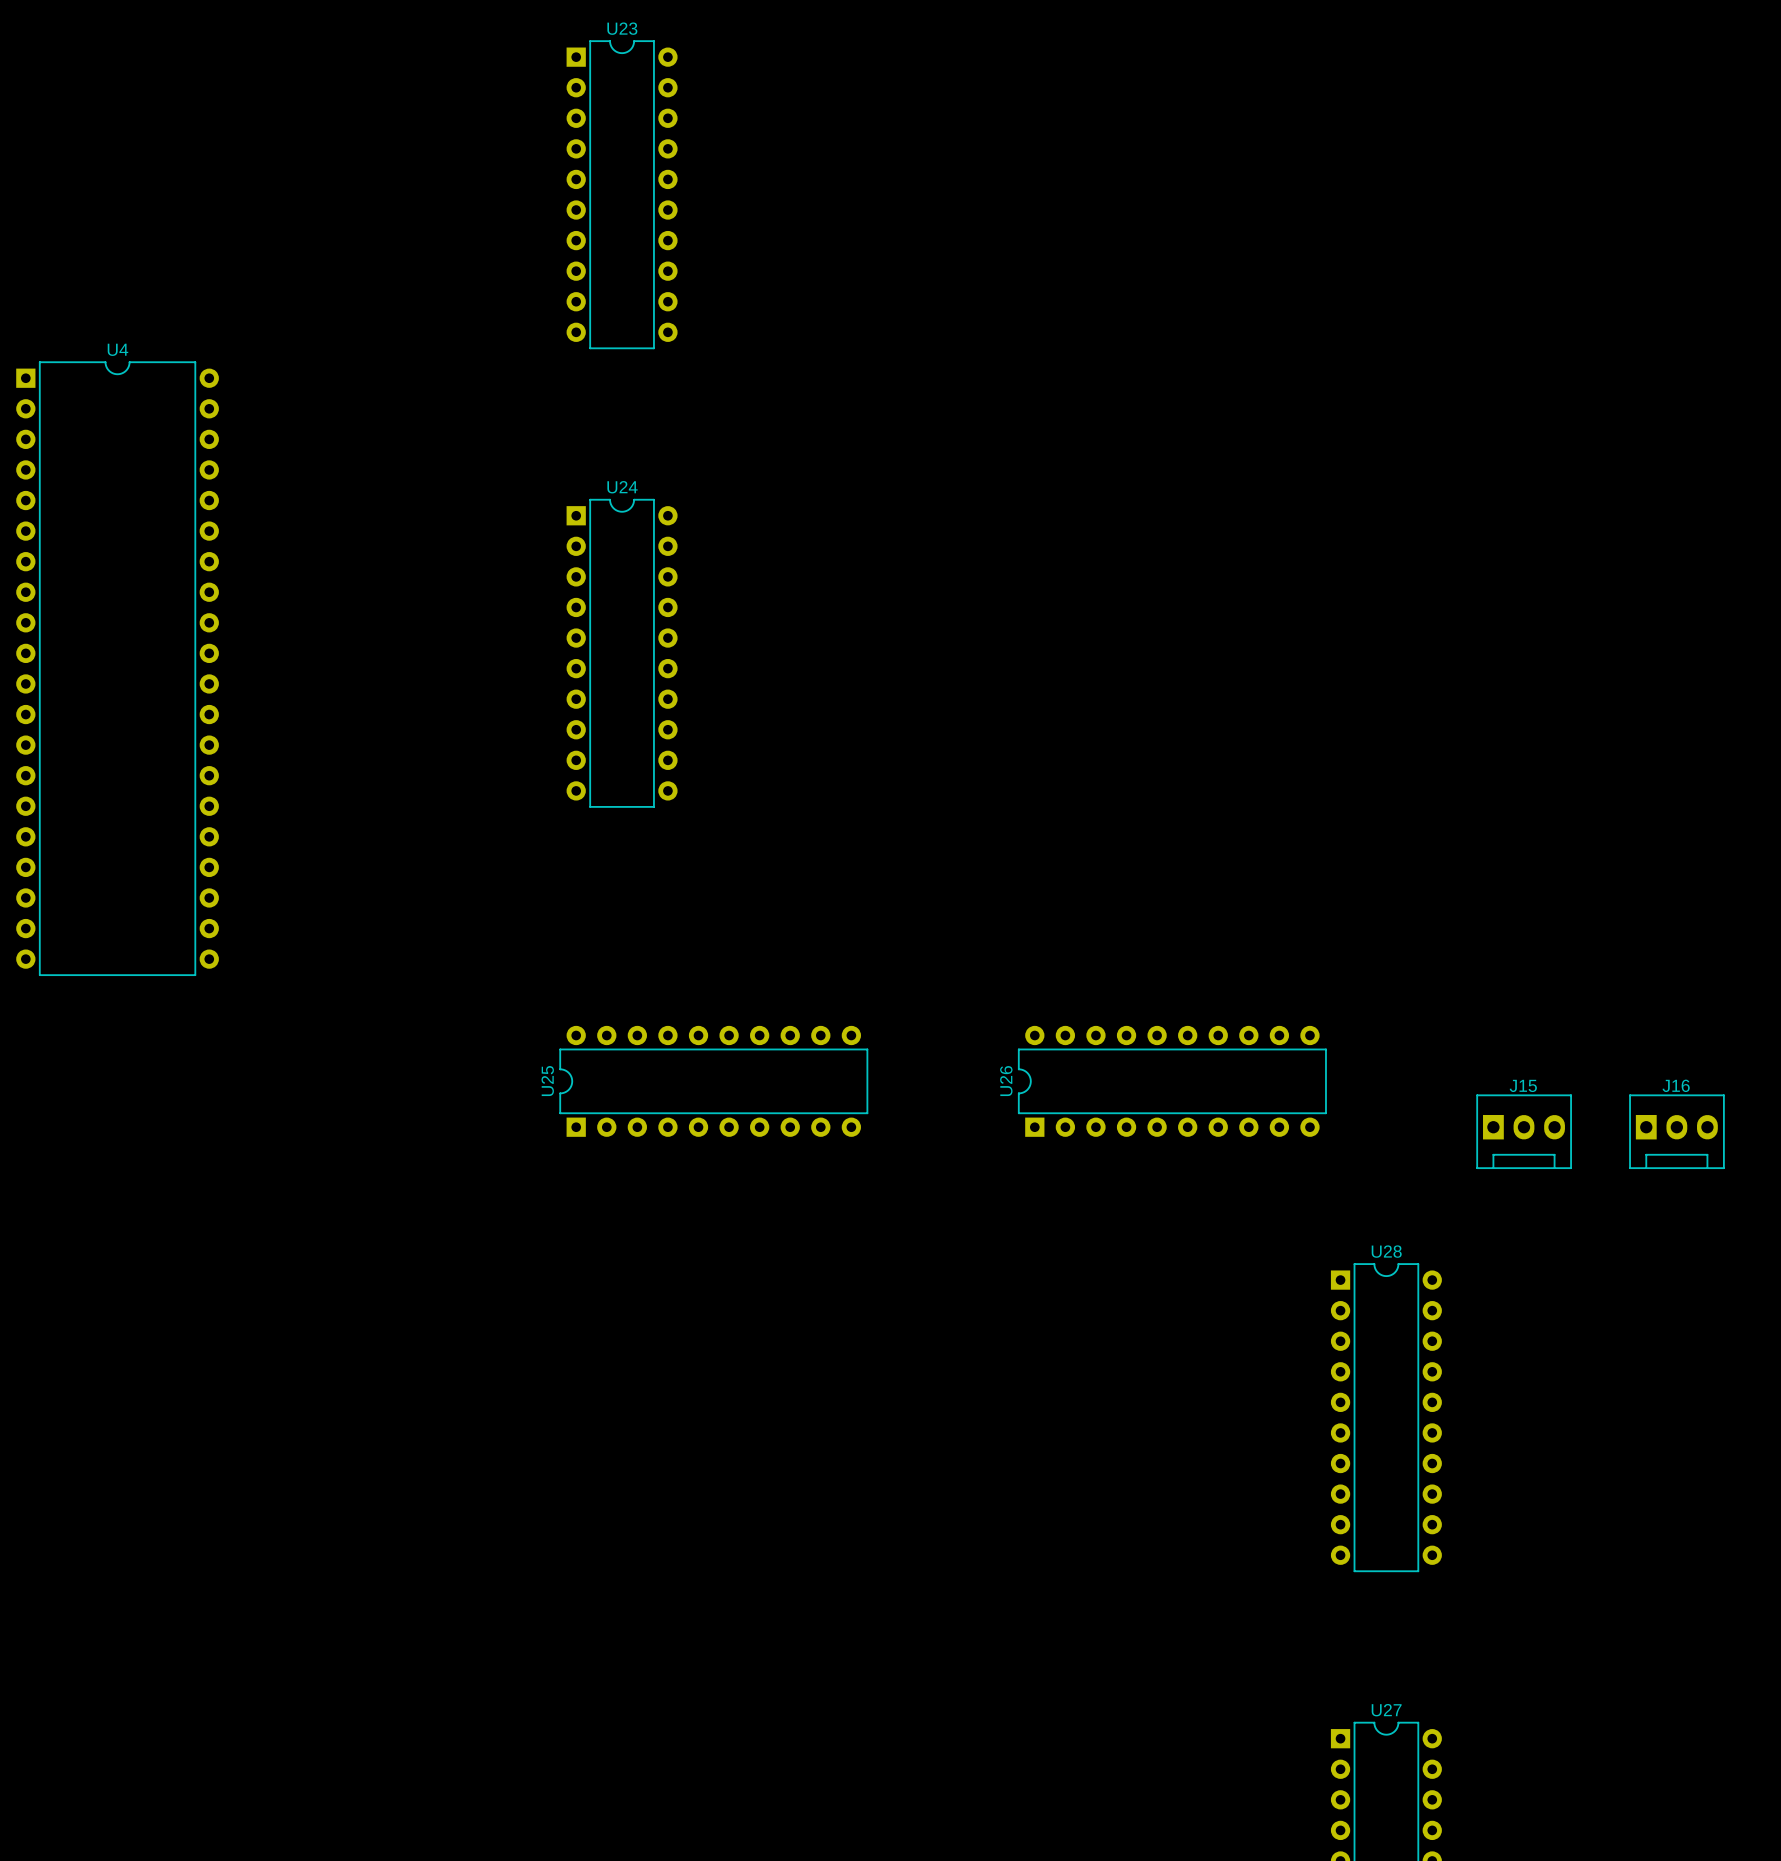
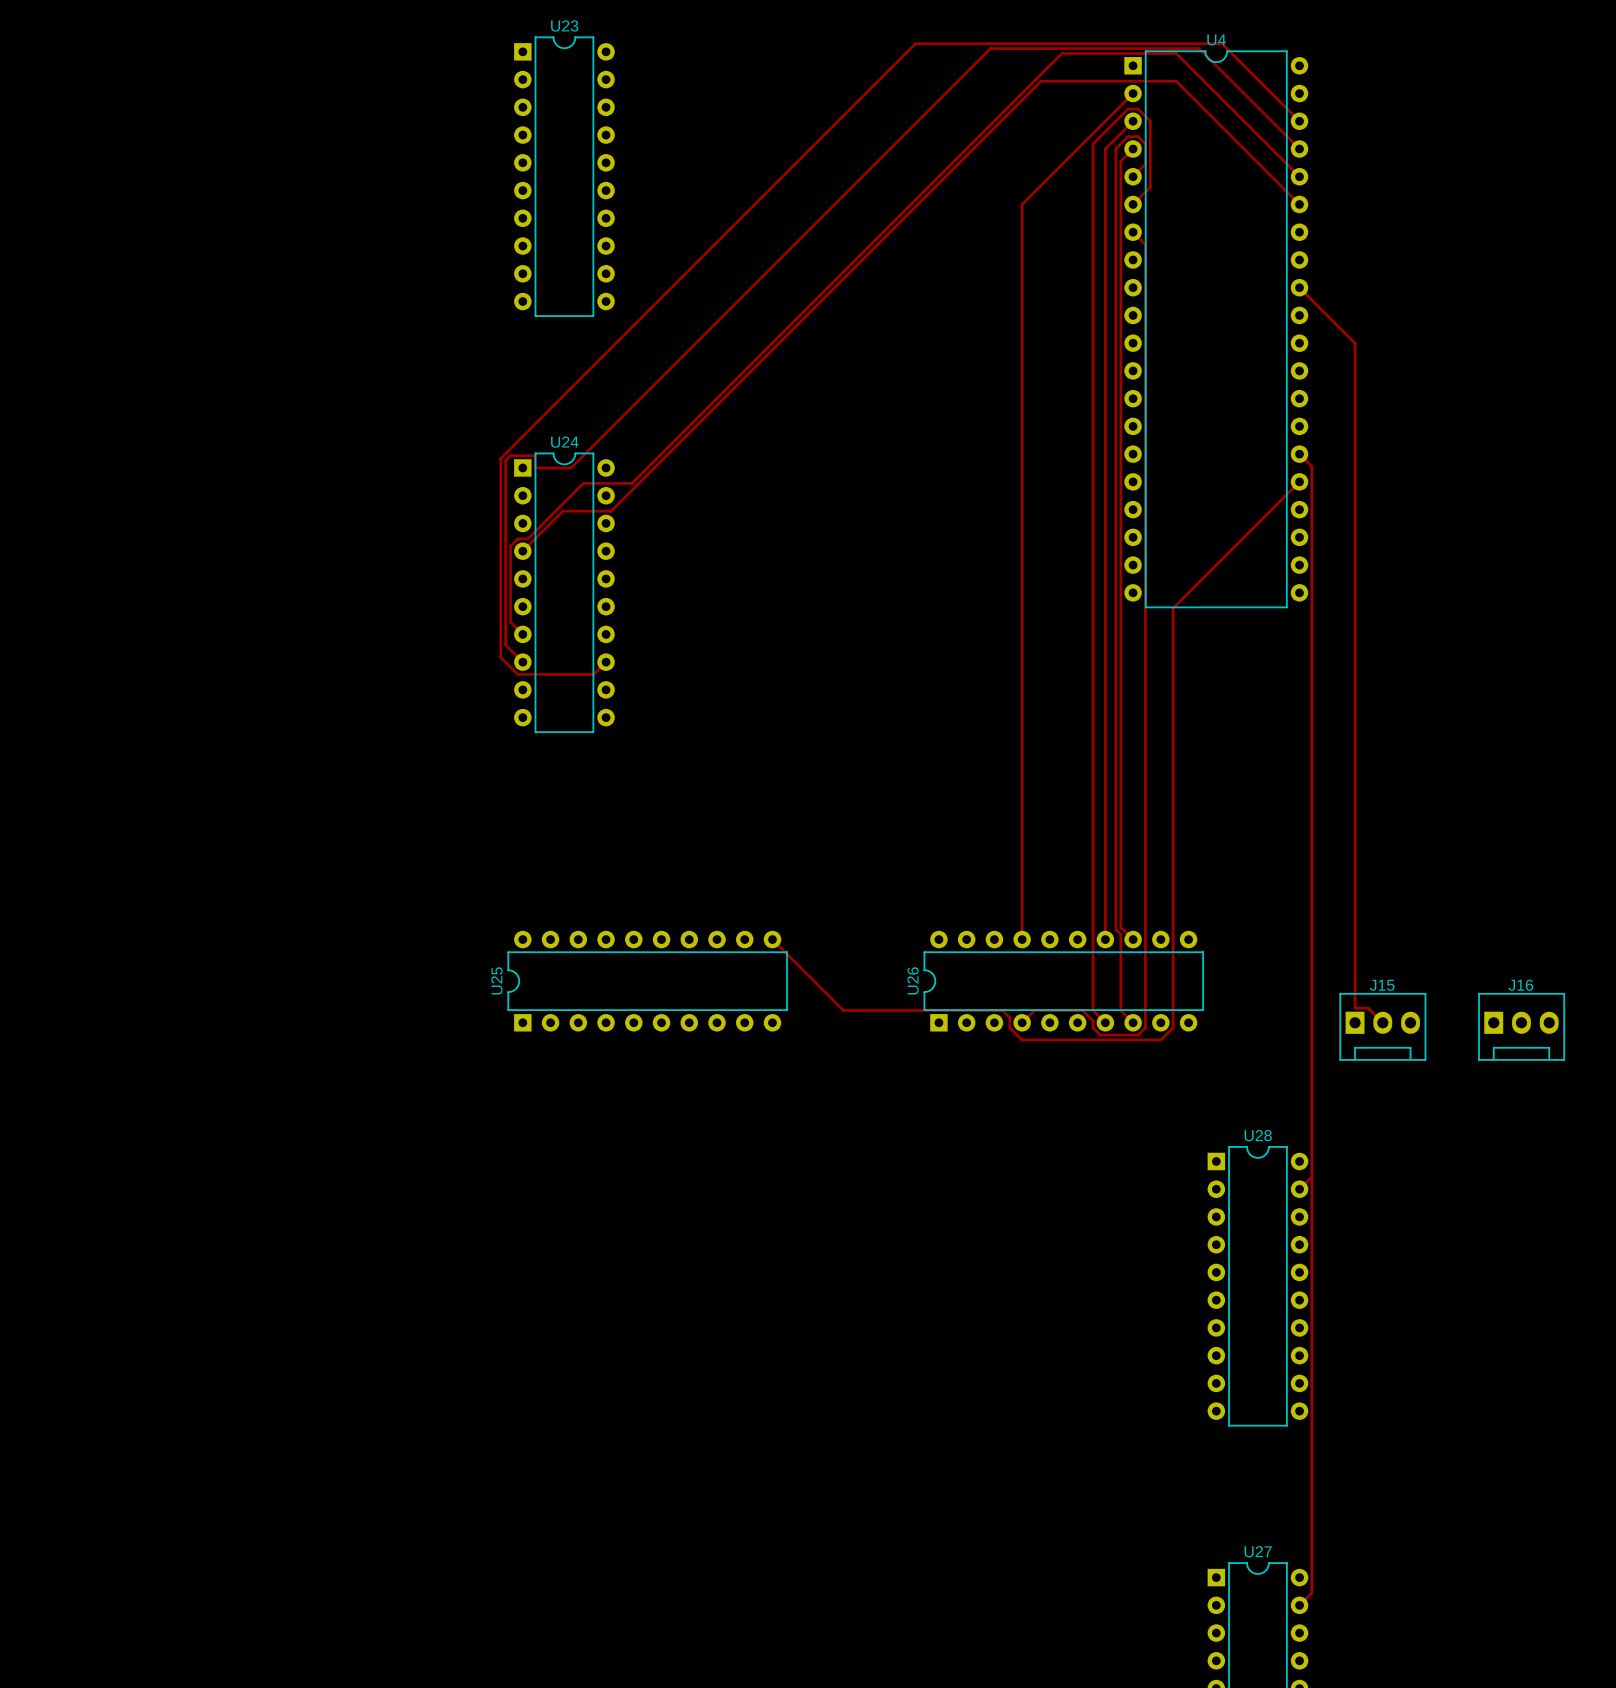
track: none -> (1133, 93) (1022, 204) (1022, 939)
track: none -> (1133, 121) (1105, 148) (1105, 939)
track: none -> (1299, 121) (1221, 43) (915, 43) (500, 458) (500, 657) (517, 674) (593, 674) (606, 662)
track: none -> (1133, 149) (1120, 161) (1120, 927) (1133, 939)
track: none -> (1299, 149) (1199, 48) (990, 48) (571, 467) (535, 467) (535, 455) (510, 455) (505, 460) (505, 644) (522, 662)
track: none -> (1133, 176) (1145, 164) (1145, 143) (1138, 136) (1127, 136) (1115, 148) (1115, 929) (1120, 934) (1120, 1010) (1133, 1022)
track: none -> (1299, 176) (1176, 53) (1061, 53) (631, 483) (583, 483) (527, 538) (517, 538) (510, 546) (510, 622) (522, 634)
track: none -> (1133, 204) (1150, 187) (1150, 121) (1138, 108) (1127, 108) (1093, 143) (1093, 1010) (1105, 1022)
track: none -> (1299, 204) (1176, 81) (1041, 81) (611, 511) (562, 511) (522, 551)
track: none -> (1133, 232) (1145, 244) (1145, 1027) (1138, 1035) (1100, 1035) (1093, 1027) (1093, 1020) (1082, 1010) (1034, 1010) (1022, 1022)
track: none -> (1299, 287) (1355, 343) (1355, 1008) (1368, 1008) (1382, 1022)
track: none -> (1299, 454) (1311, 466) (1311, 1593) (1299, 1605)
track: none -> (1299, 481) (1173, 608) (1173, 1027) (1161, 1039) (1021, 1039) (1009, 1027) (1009, 1017) (1002, 1010) (843, 1010) (772, 939)
U4 position: (117, 668) -> (1216, 329)
track: none -> (1311, 1176) (1299, 1189)

